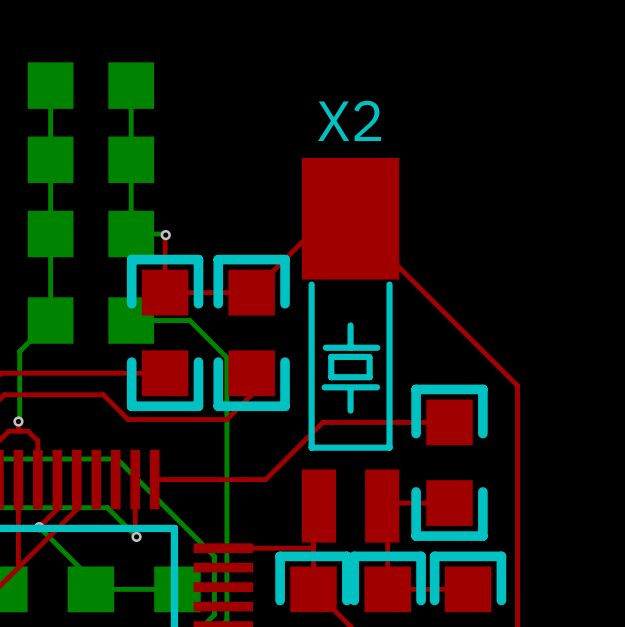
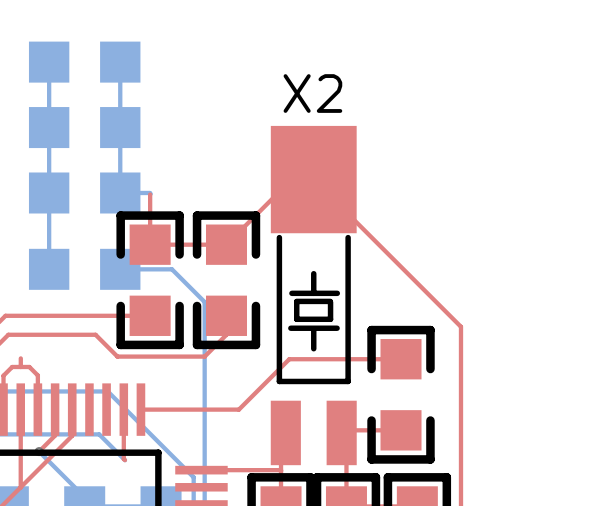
via: (165, 235) -> none
bottom track: (50, 320) (19, 351) (18, 421) -> none
via: (18, 421) -> none
via: (136, 536) -> none

